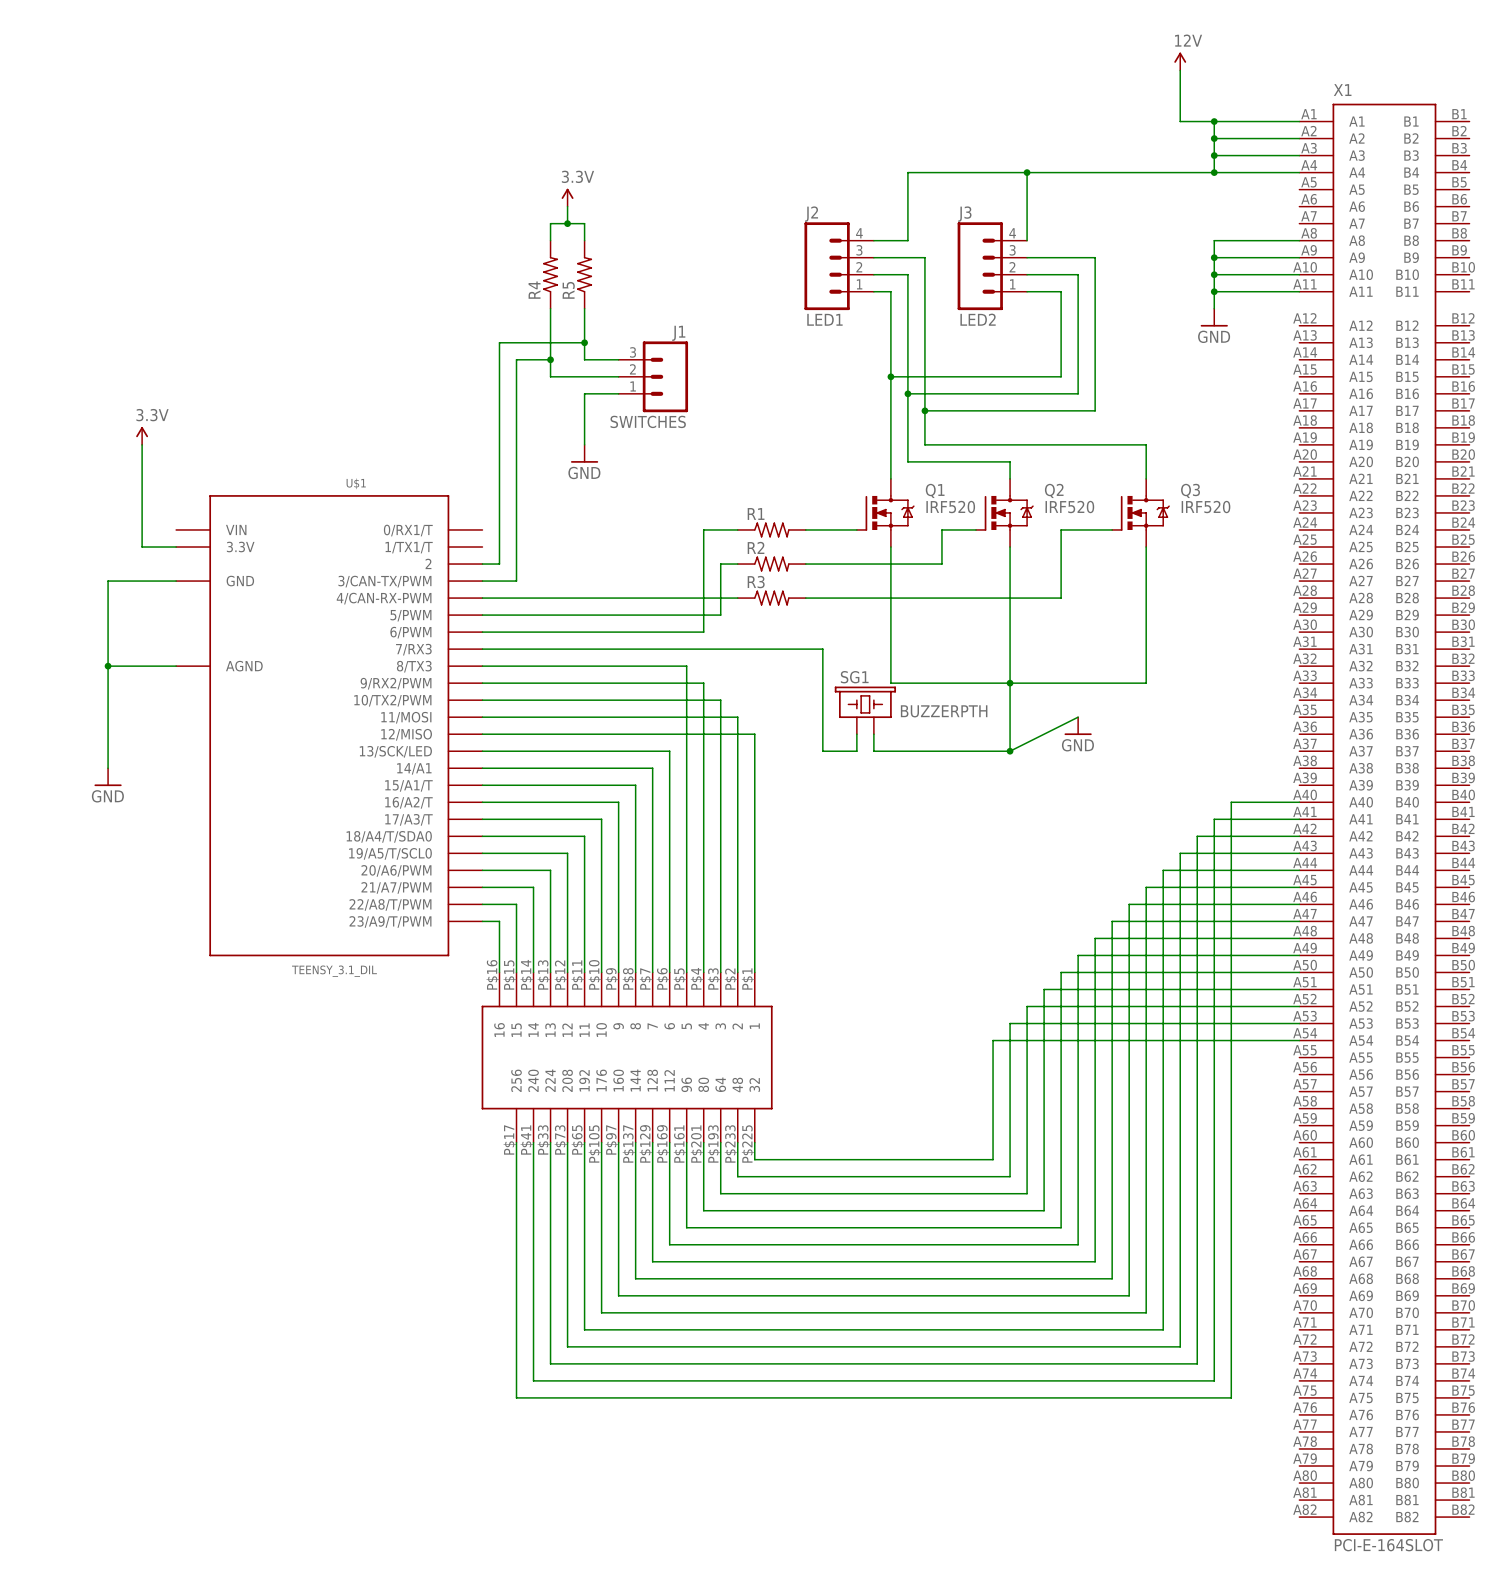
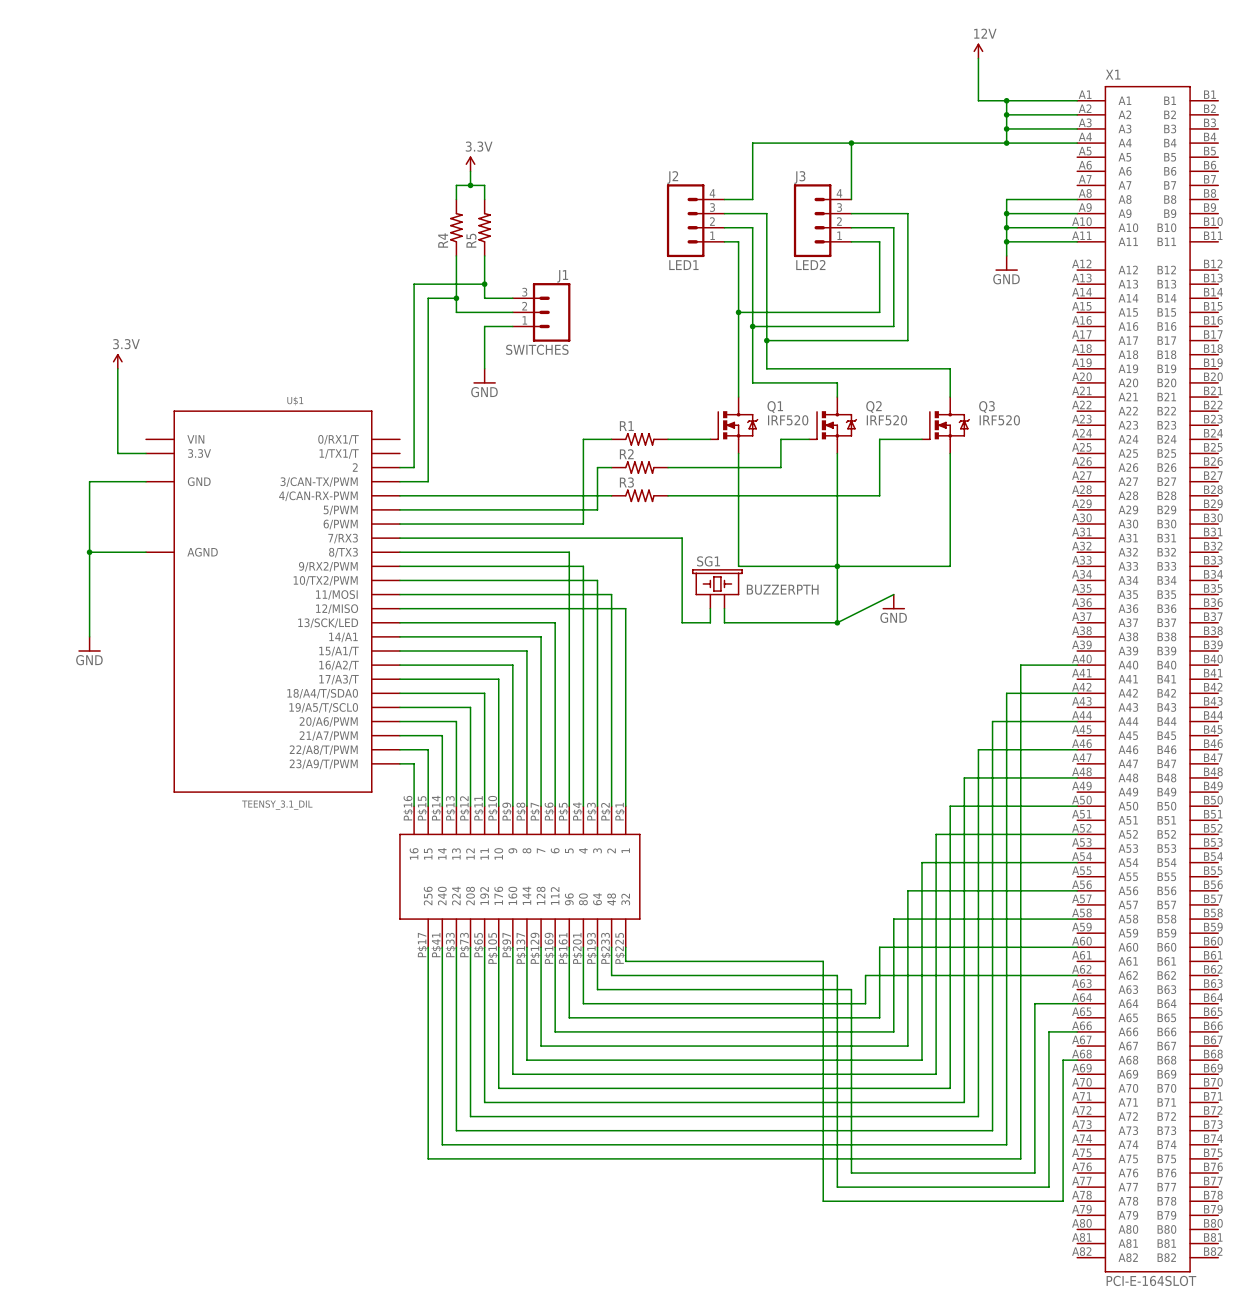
wire: (1299, 819) (1214, 819) (1214, 836) (1197, 836) (1197, 870) (1163, 870) (1163, 938) (1095, 938) (1095, 1074) -> (1077, 890) (907, 890)
wire: (1299, 853) (1180, 853) (1180, 904) (1129, 904) (1129, 1006) (1027, 1006) (1027, 1193) -> (1077, 1003) (1034, 1003) (1034, 1173) (851, 1173) (851, 989)
wire: (1299, 887) (1146, 887) (1146, 972) (1061, 972) (1061, 1142) -> (1077, 947) (879, 947)
wire: (1299, 921) (1112, 921) (1112, 1040) (993, 1040) (993, 1159) -> (1077, 1060) (1063, 1060) (1063, 1201) (823, 1201) (823, 961)
wire: (1299, 955) (1078, 955) (1078, 1108) -> (1077, 919) (893, 919)
wire: (1299, 989) (1044, 989) (1044, 1176) -> (1077, 975) (865, 975)
wire: (1299, 1023) (1010, 1023) (1010, 1176) -> (1077, 1031) (1048, 1031) (1048, 1187) (837, 1187) (837, 975)

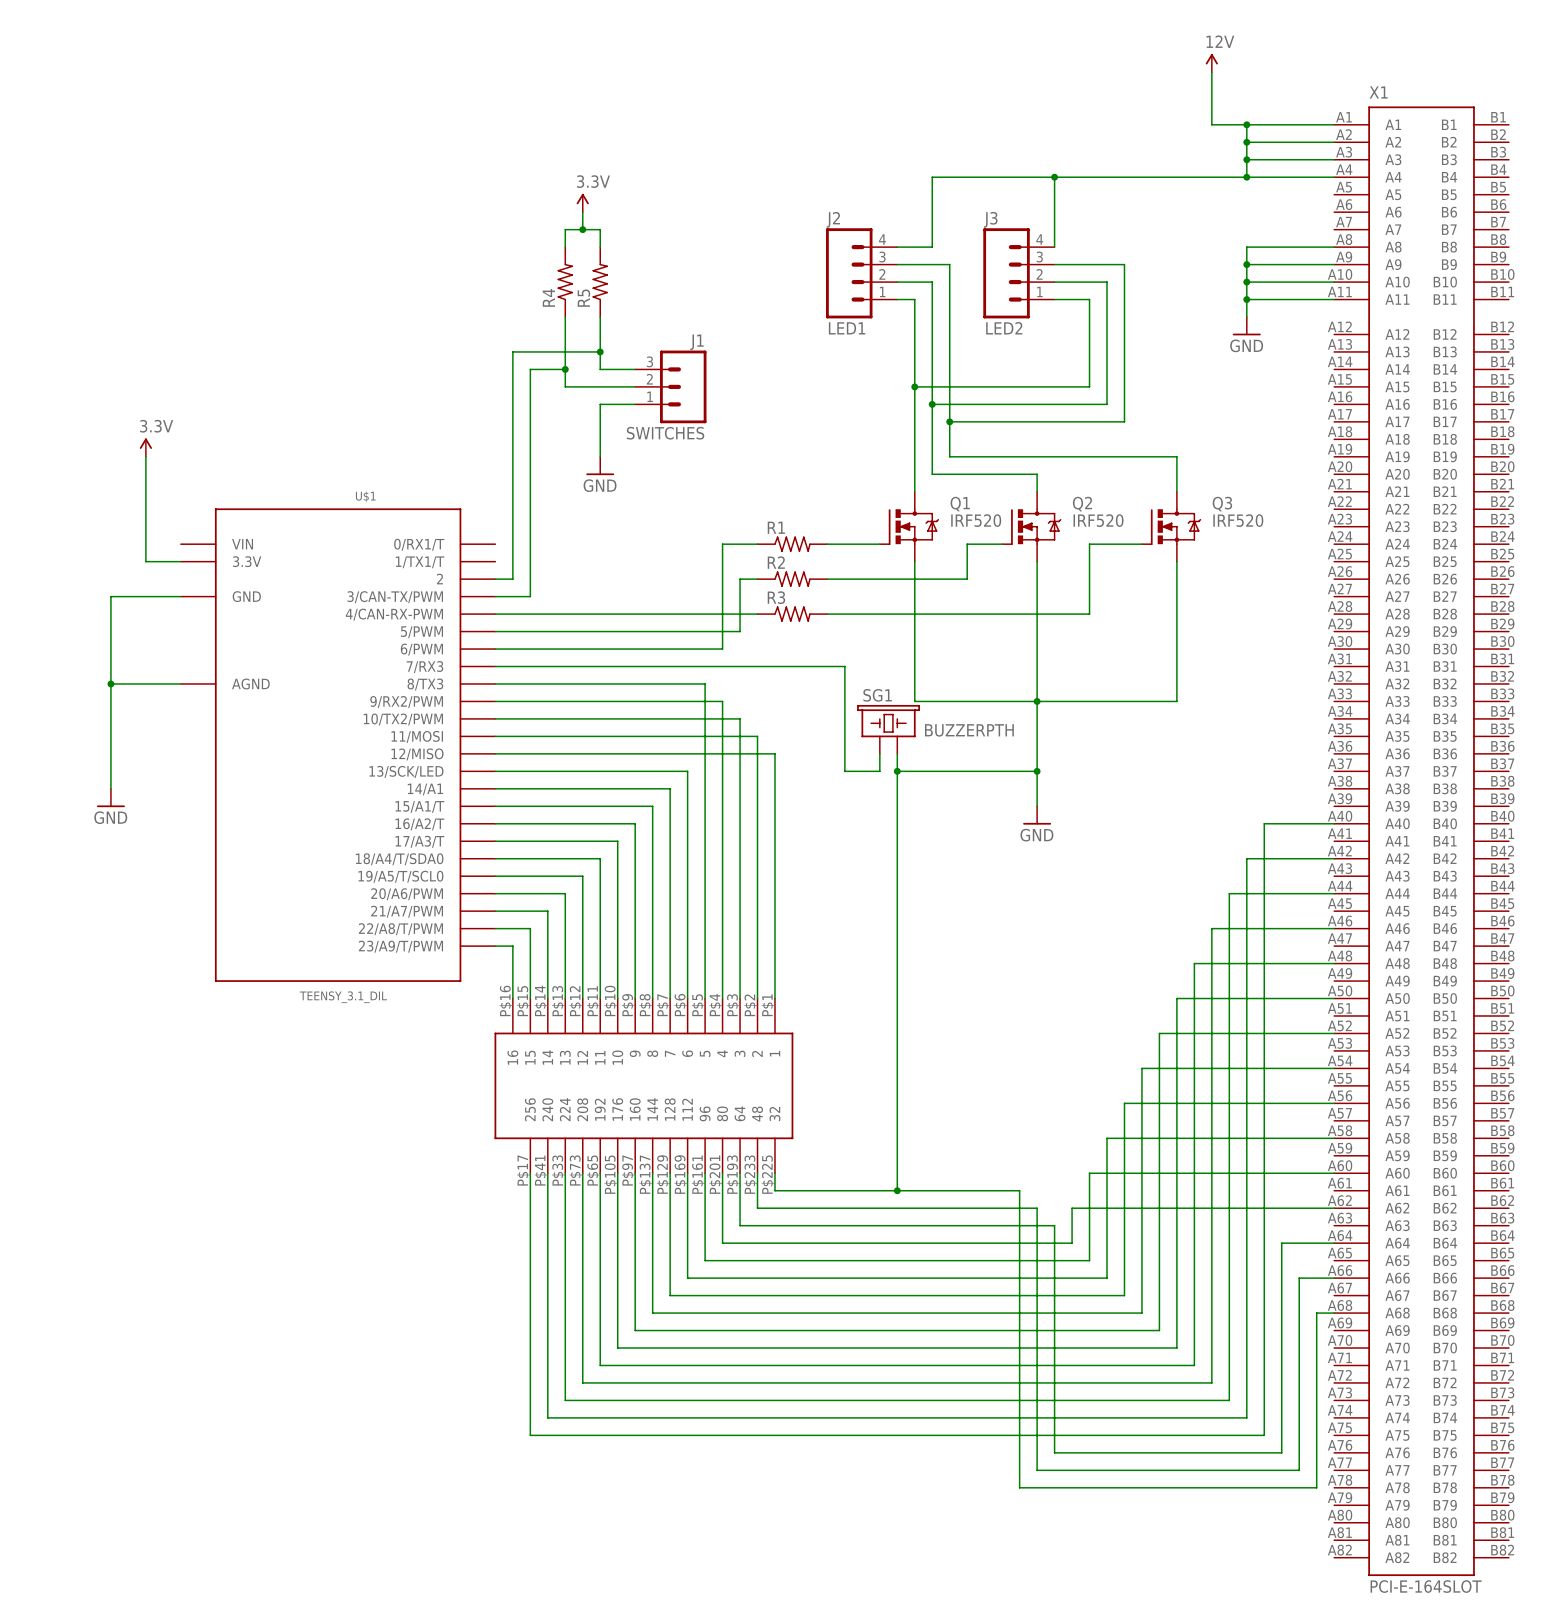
wire: (893, 594) (837, 622) -> (1037, 806) (1037, 771)
power symbol position: GND (893, 601) -> GND (1037, 815)
wire: none -> (897, 771) (897, 1190)
junction: none -> (897, 771)
junction: none -> (897, 1190)

